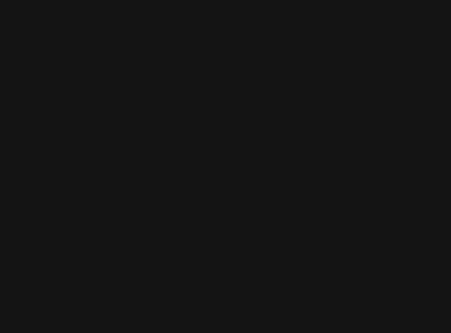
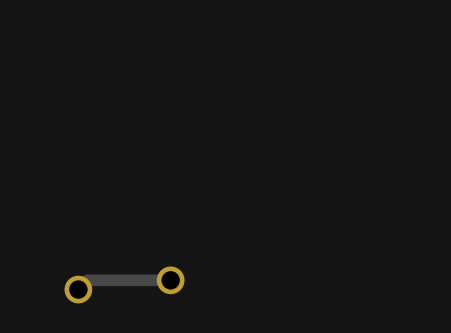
track: none -> (170, 280) (87, 280) (78, 289)
via: none -> (170, 280)
via: none -> (78, 289)

